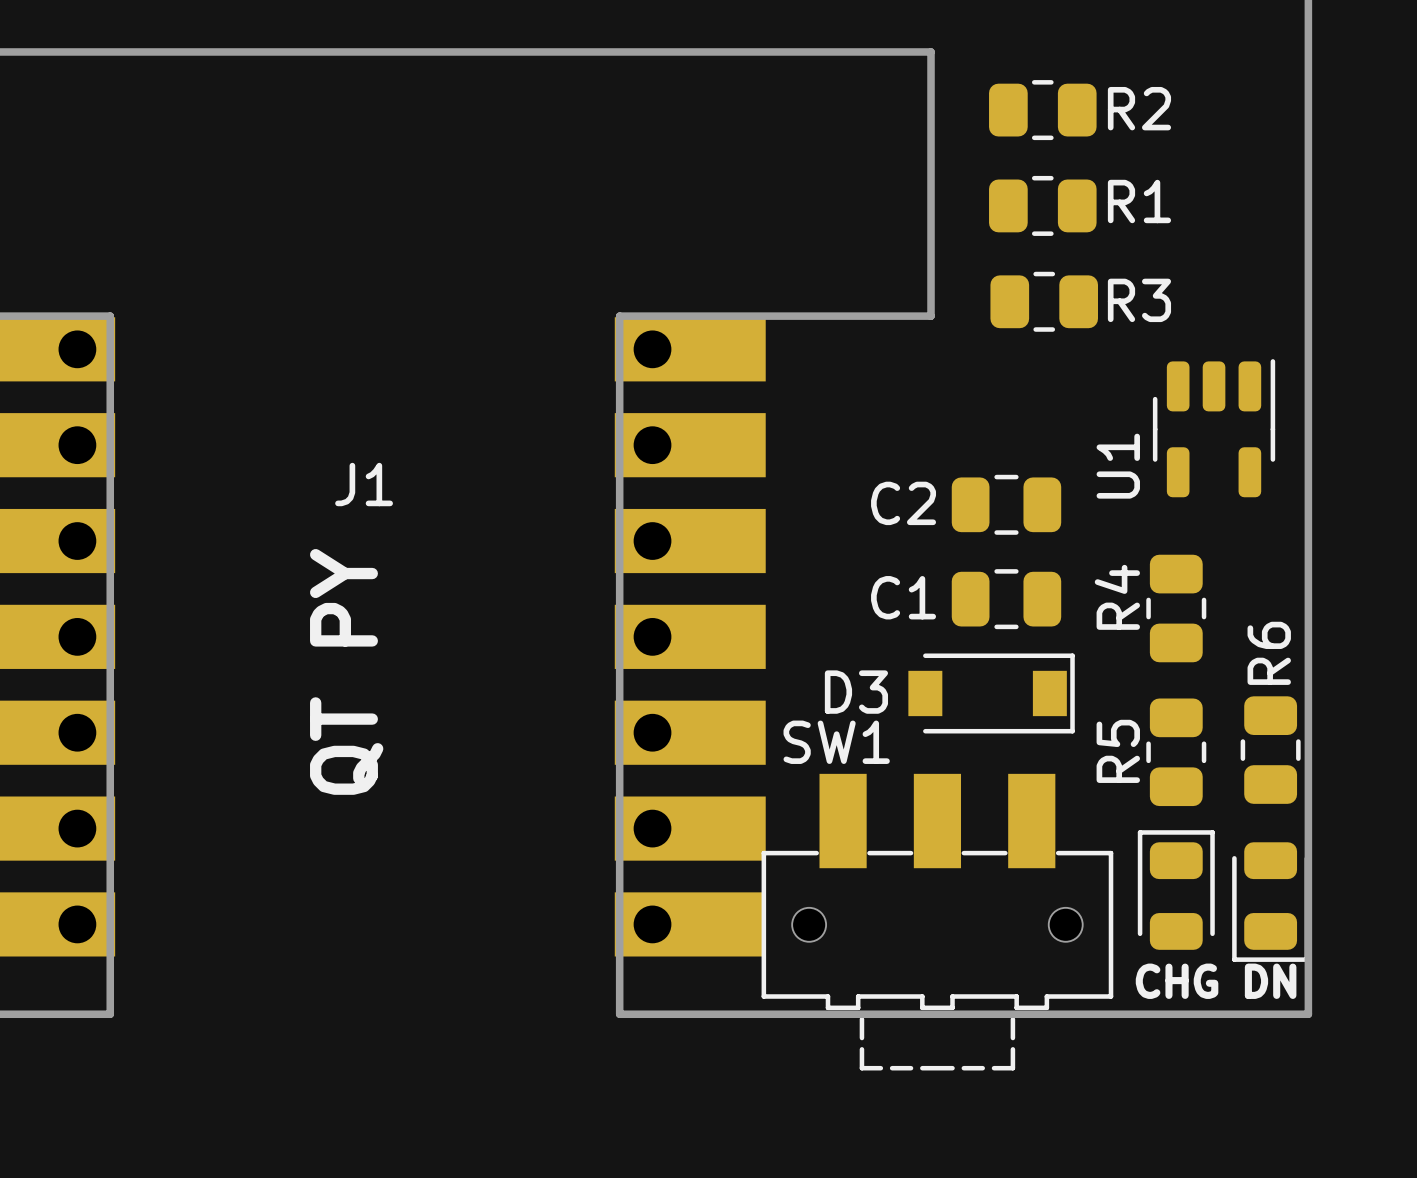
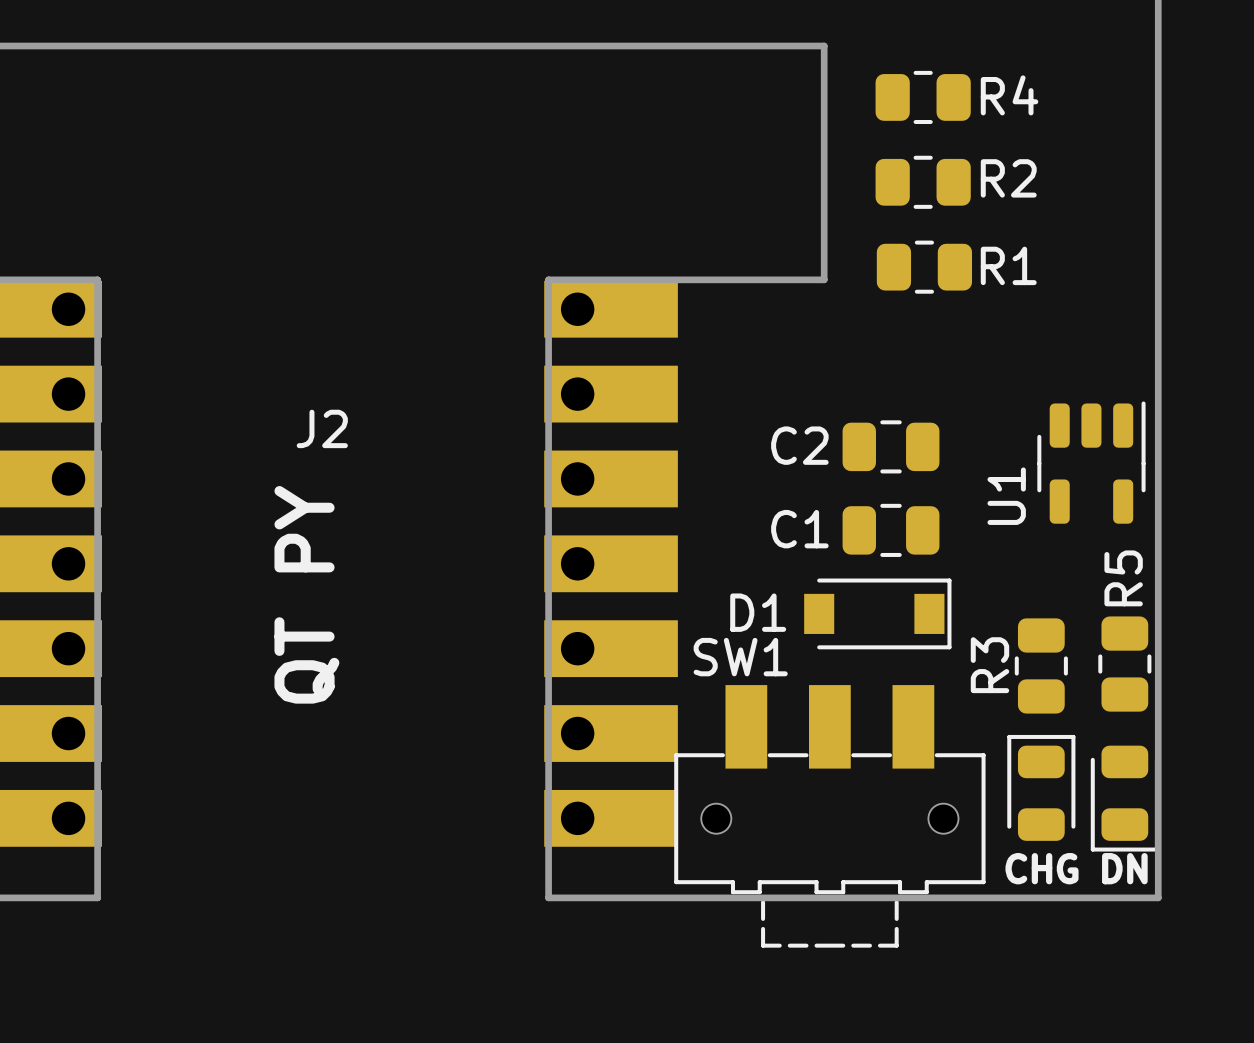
R2 name: R2 (1139, 108) -> R4 (1009, 95)
R1 name: R1 (1139, 201) -> R2 (1008, 178)
R3 name: R3 (1139, 300) -> R1 (1008, 265)
U1 position: (1214, 428) -> (1091, 462)
J1 name: J1 (364, 484) -> J2 (322, 428)
R4: (1176, 608) -> none
R6 name: R6 (1269, 653) -> R5 (1123, 578)
D3 name: D3 (856, 692) -> D1 (758, 612)
R5 name: R5 (1118, 751) -> R3 (989, 665)

